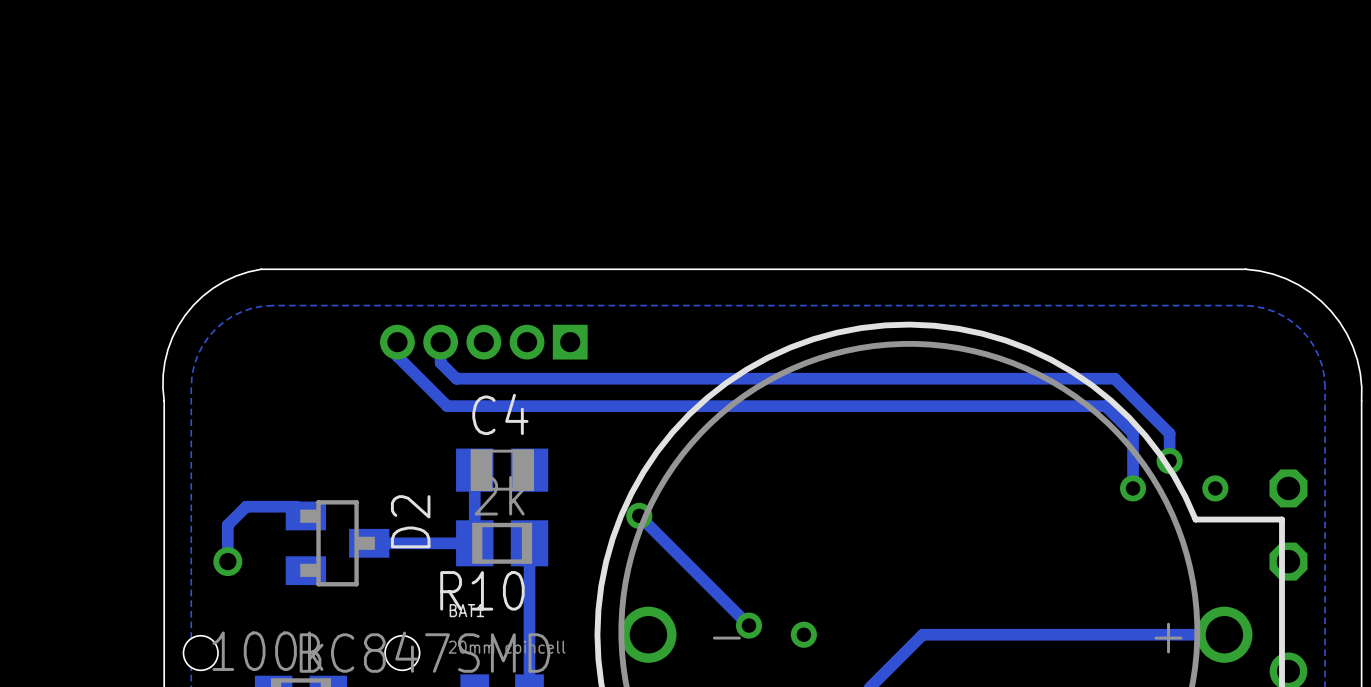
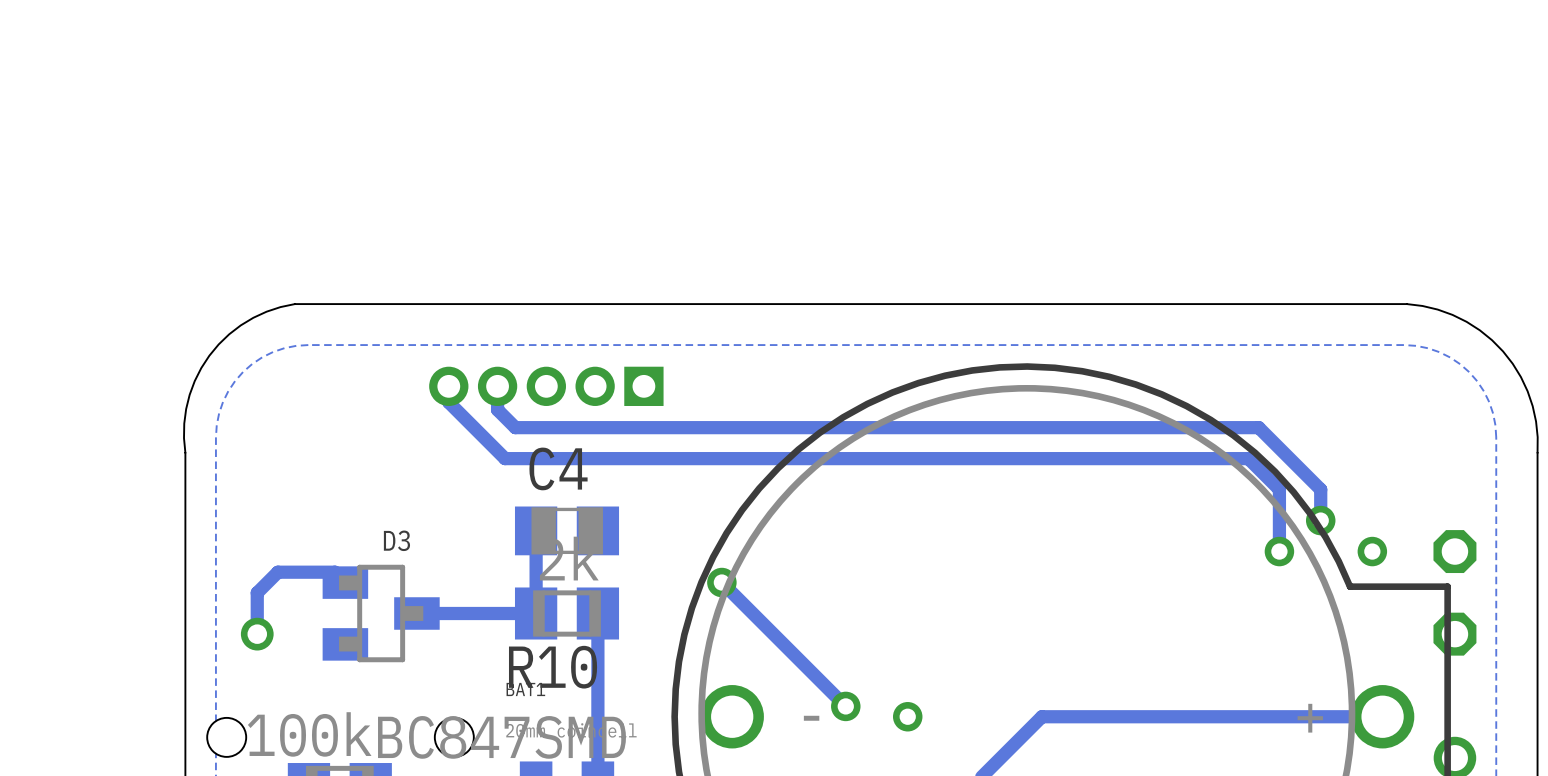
D2 name: D2 (410, 521) -> D3 (396, 540)

